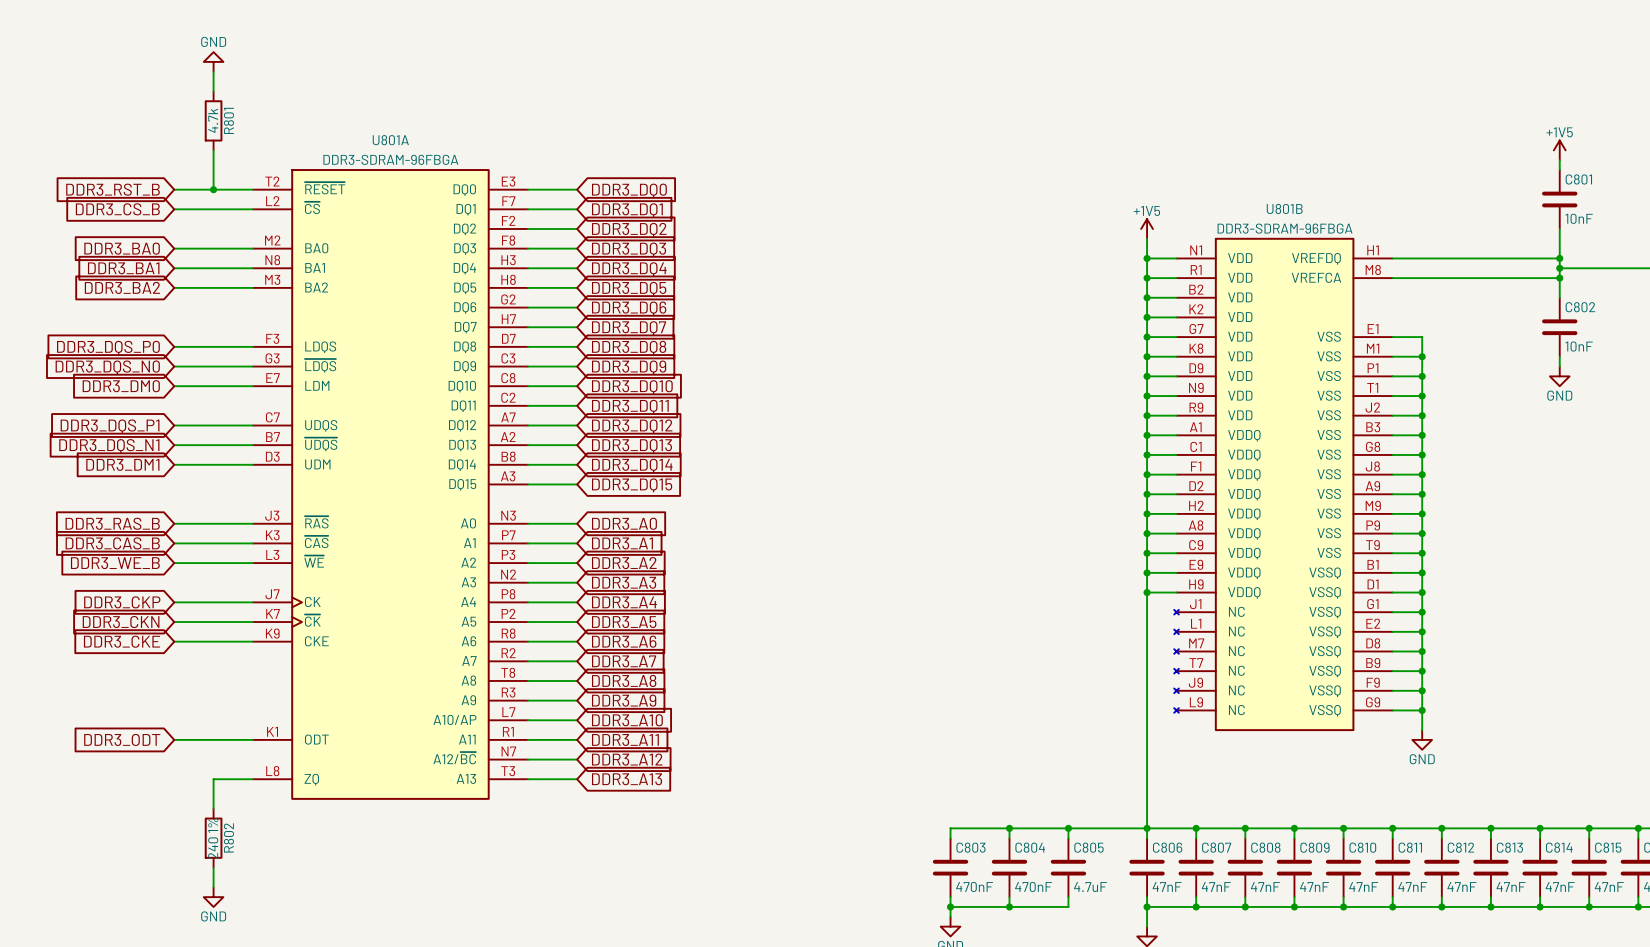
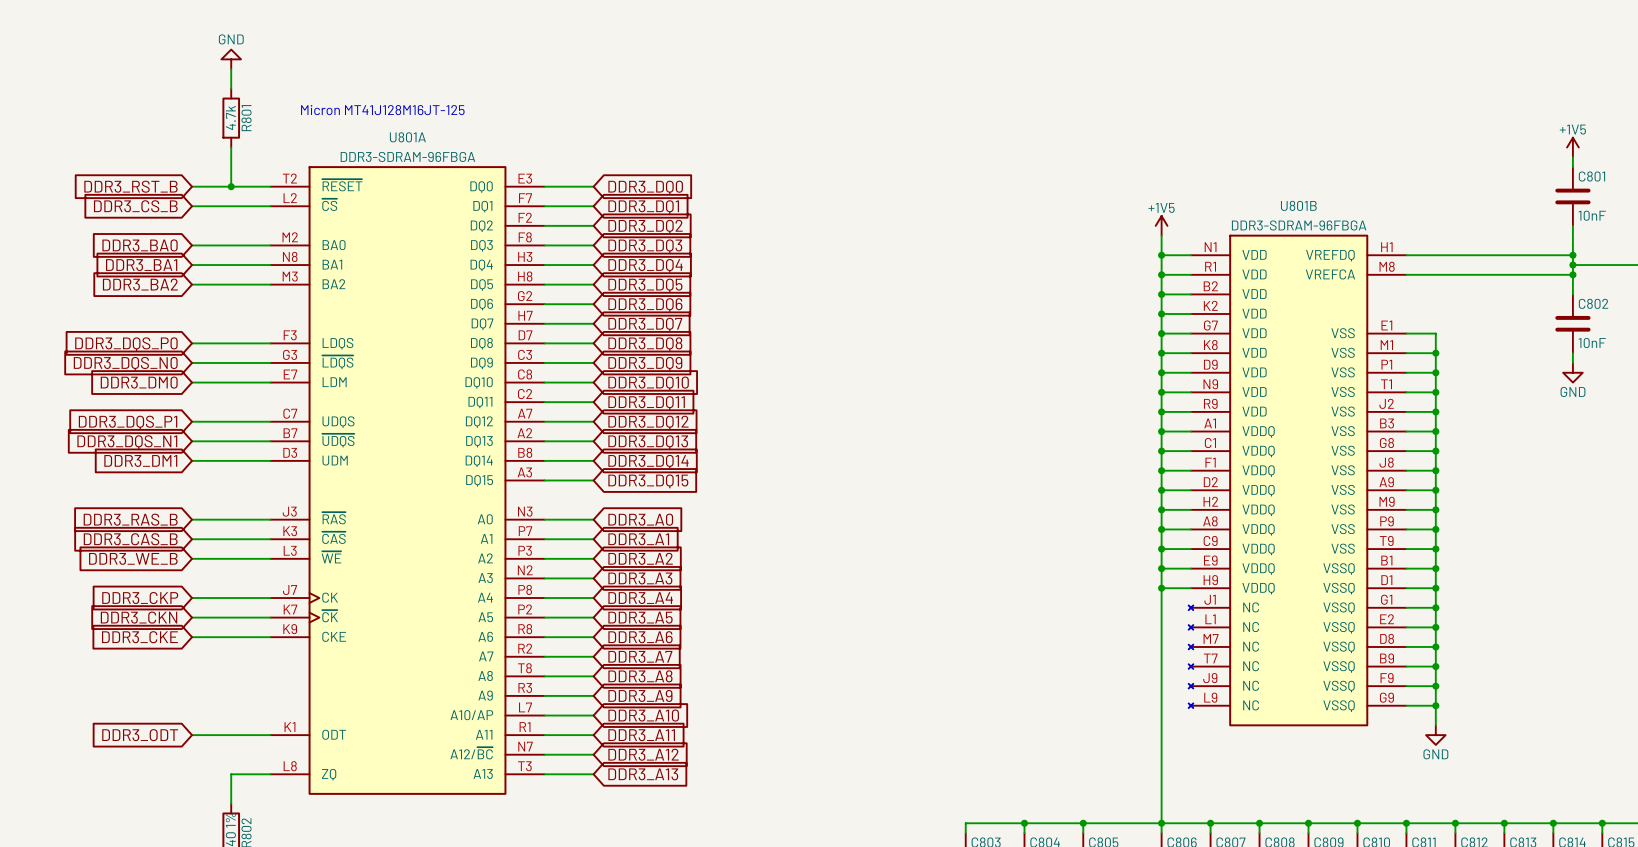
text: none -> Micron MT41J128M16JT-125 (382, 110)

